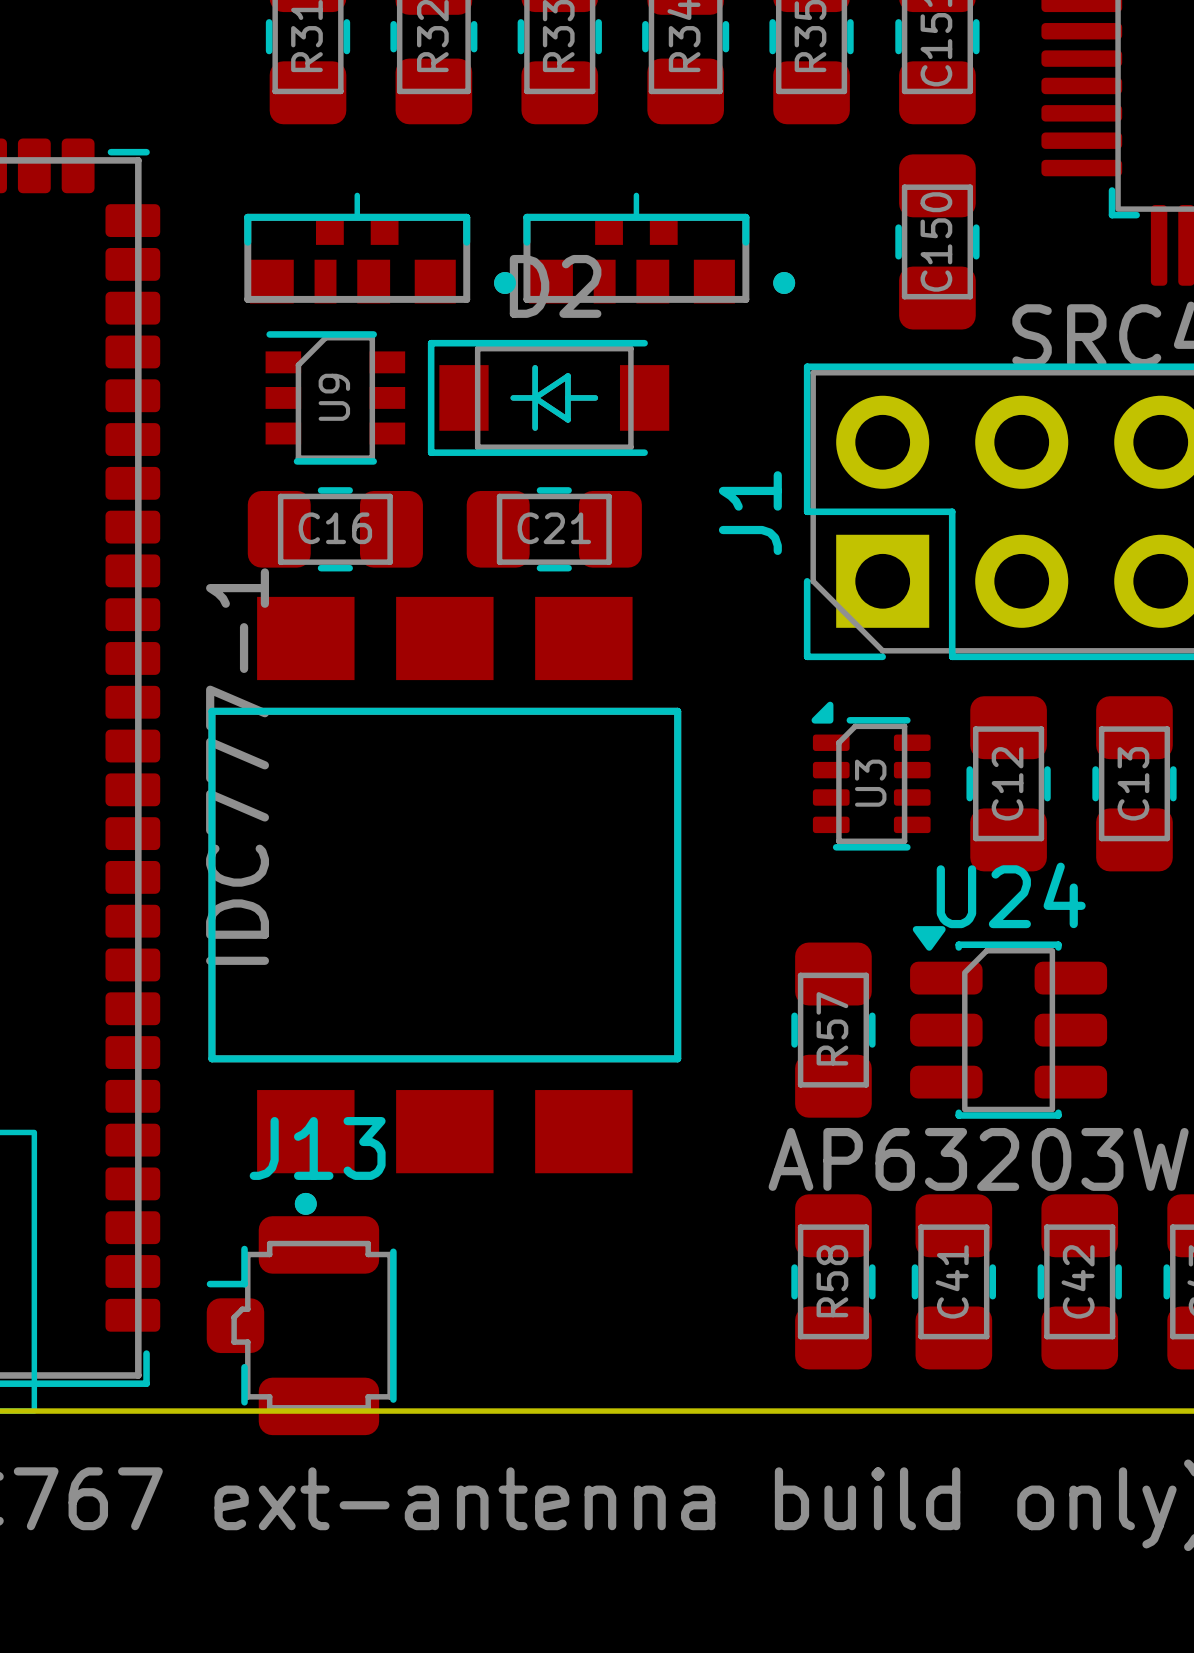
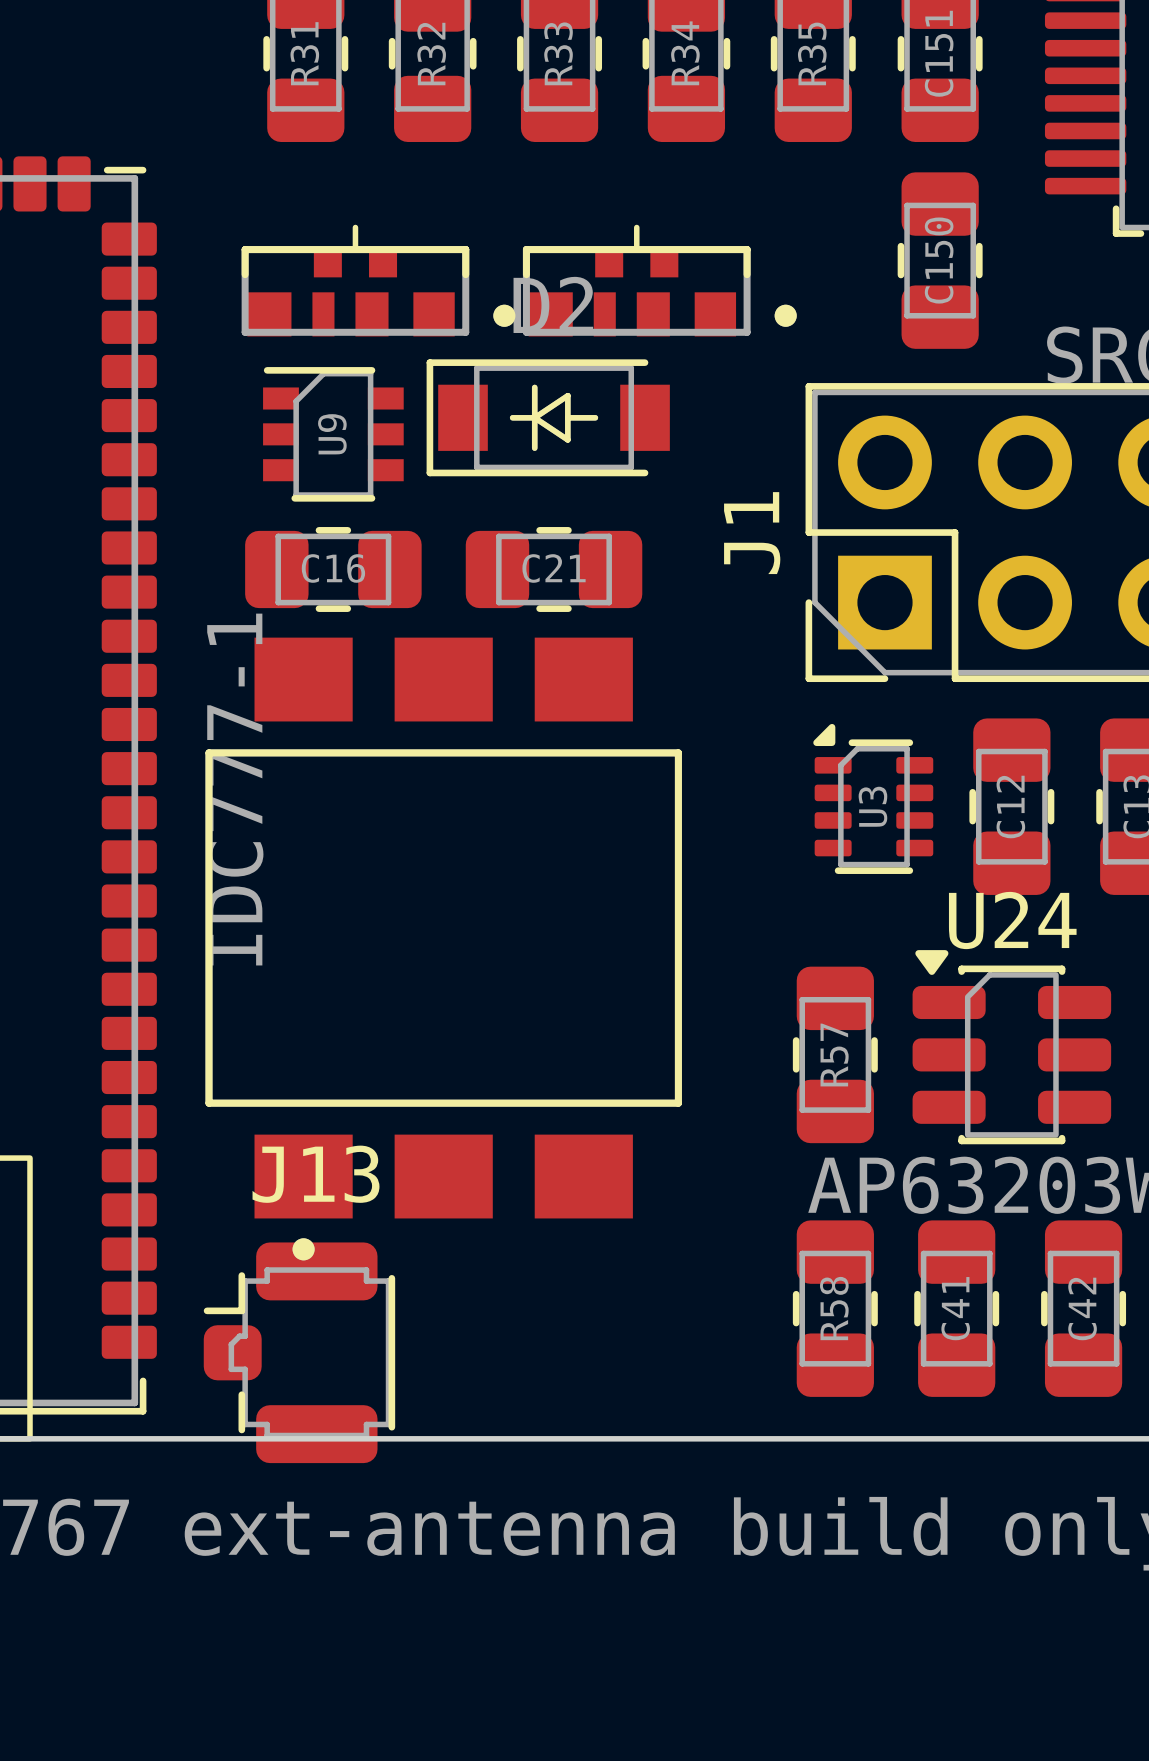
part position: (380, 248) -> (378, 280)
part position: (659, 248) -> (659, 280)
U9 position: (335, 397) -> (333, 434)
C16 position: (335, 529) -> (333, 569)
C21 position: (554, 529) -> (554, 569)
part position: (444, 905) -> (443, 949)

